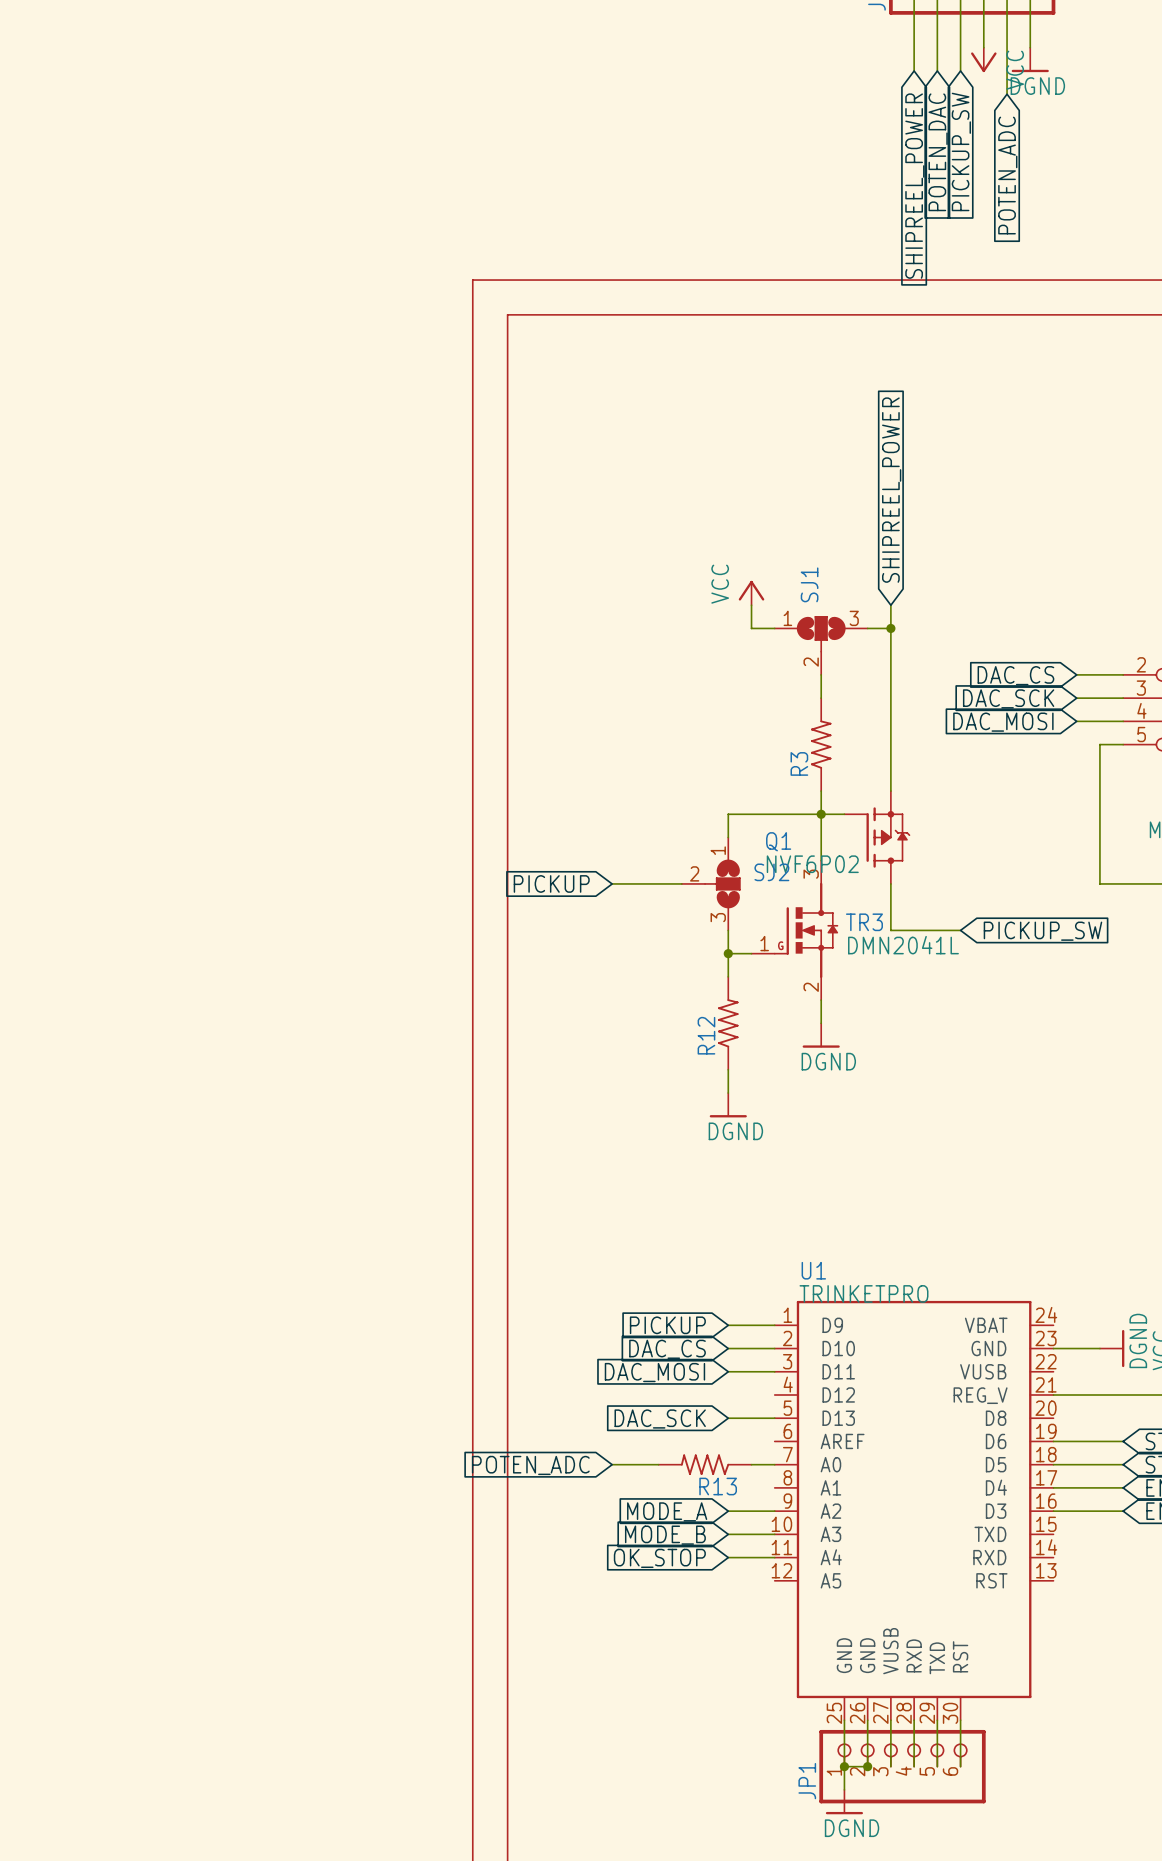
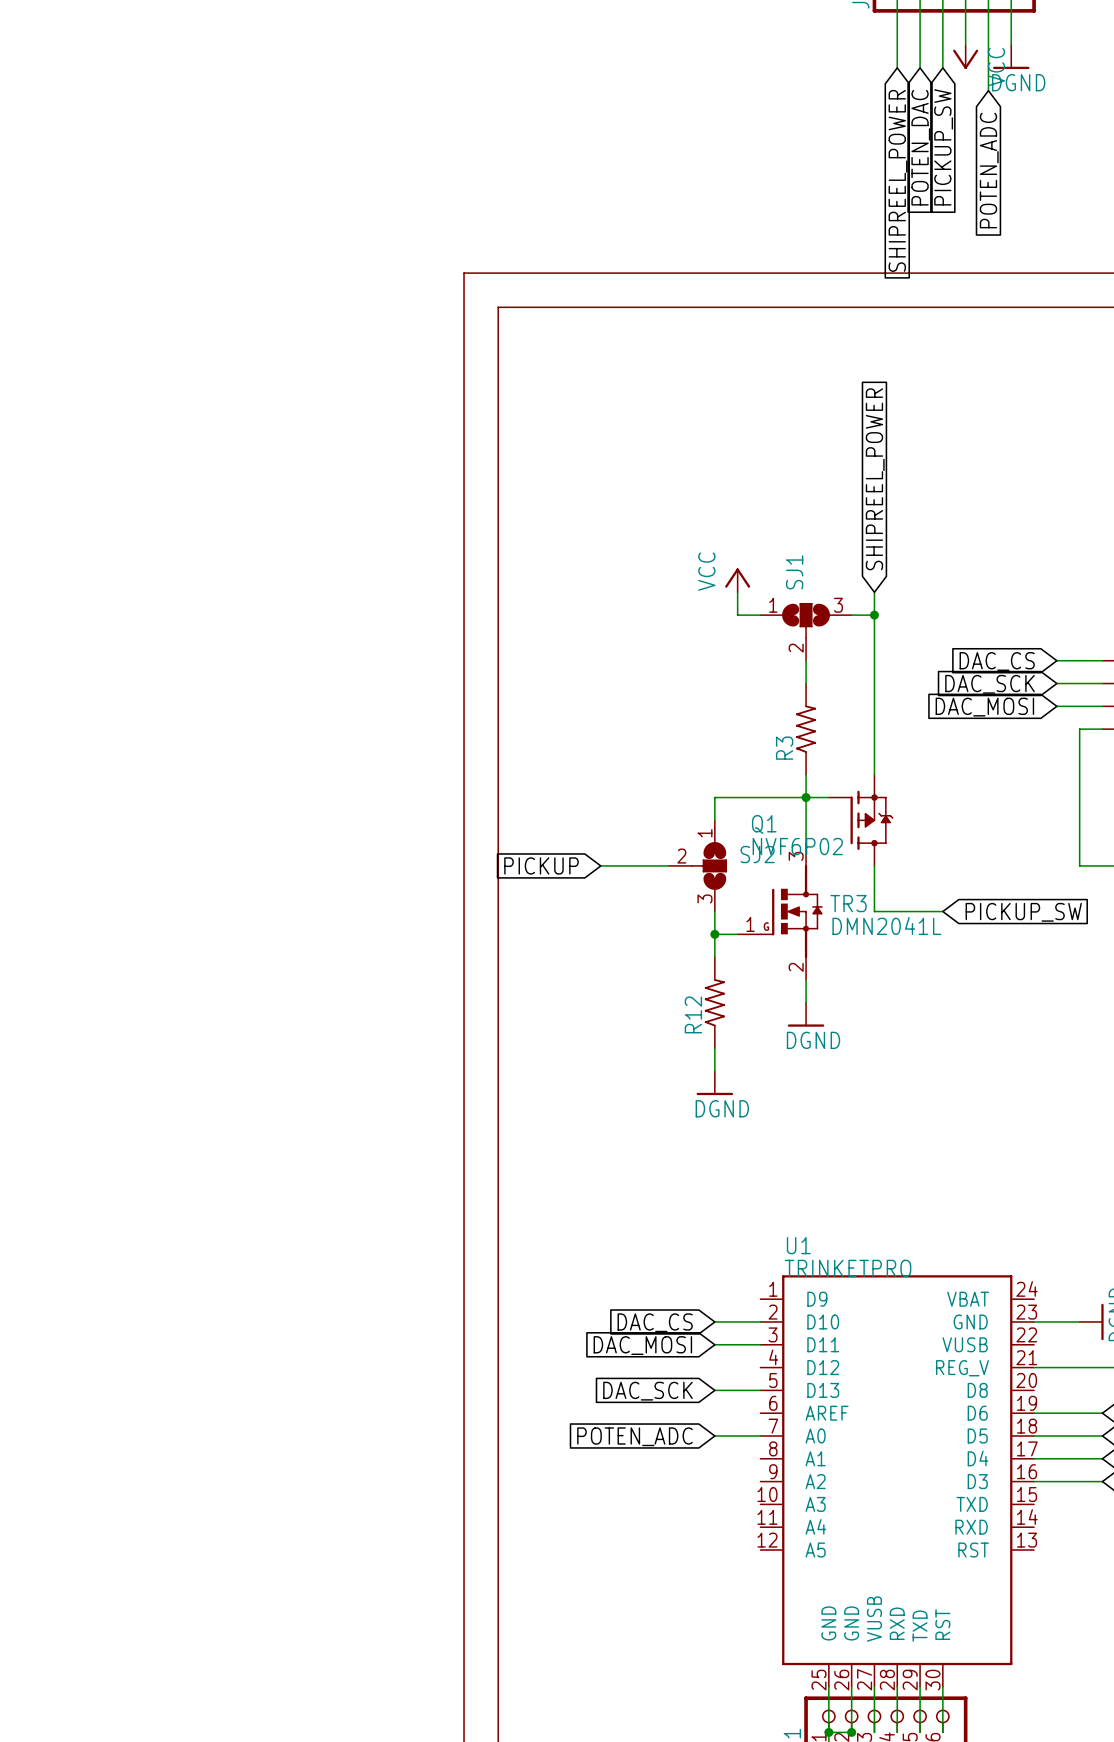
global label: PICKUP (667, 1325) -> none
wire: (728, 1325) (774, 1325) -> none
wire: (612, 1464) (658, 1464) -> none
R13: (705, 1464) -> none
global label position: POTEN_ADC (530, 1465) -> POTEN_ADC (634, 1436)
global label: MODE_A (667, 1511) -> none
wire: (728, 1511) (774, 1511) -> none
wire: (728, 1534) (774, 1534) -> none
global label: MODE_B (665, 1535) -> none
wire: (728, 1557) (774, 1557) -> none
global label: OK_STOP (659, 1558) -> none

